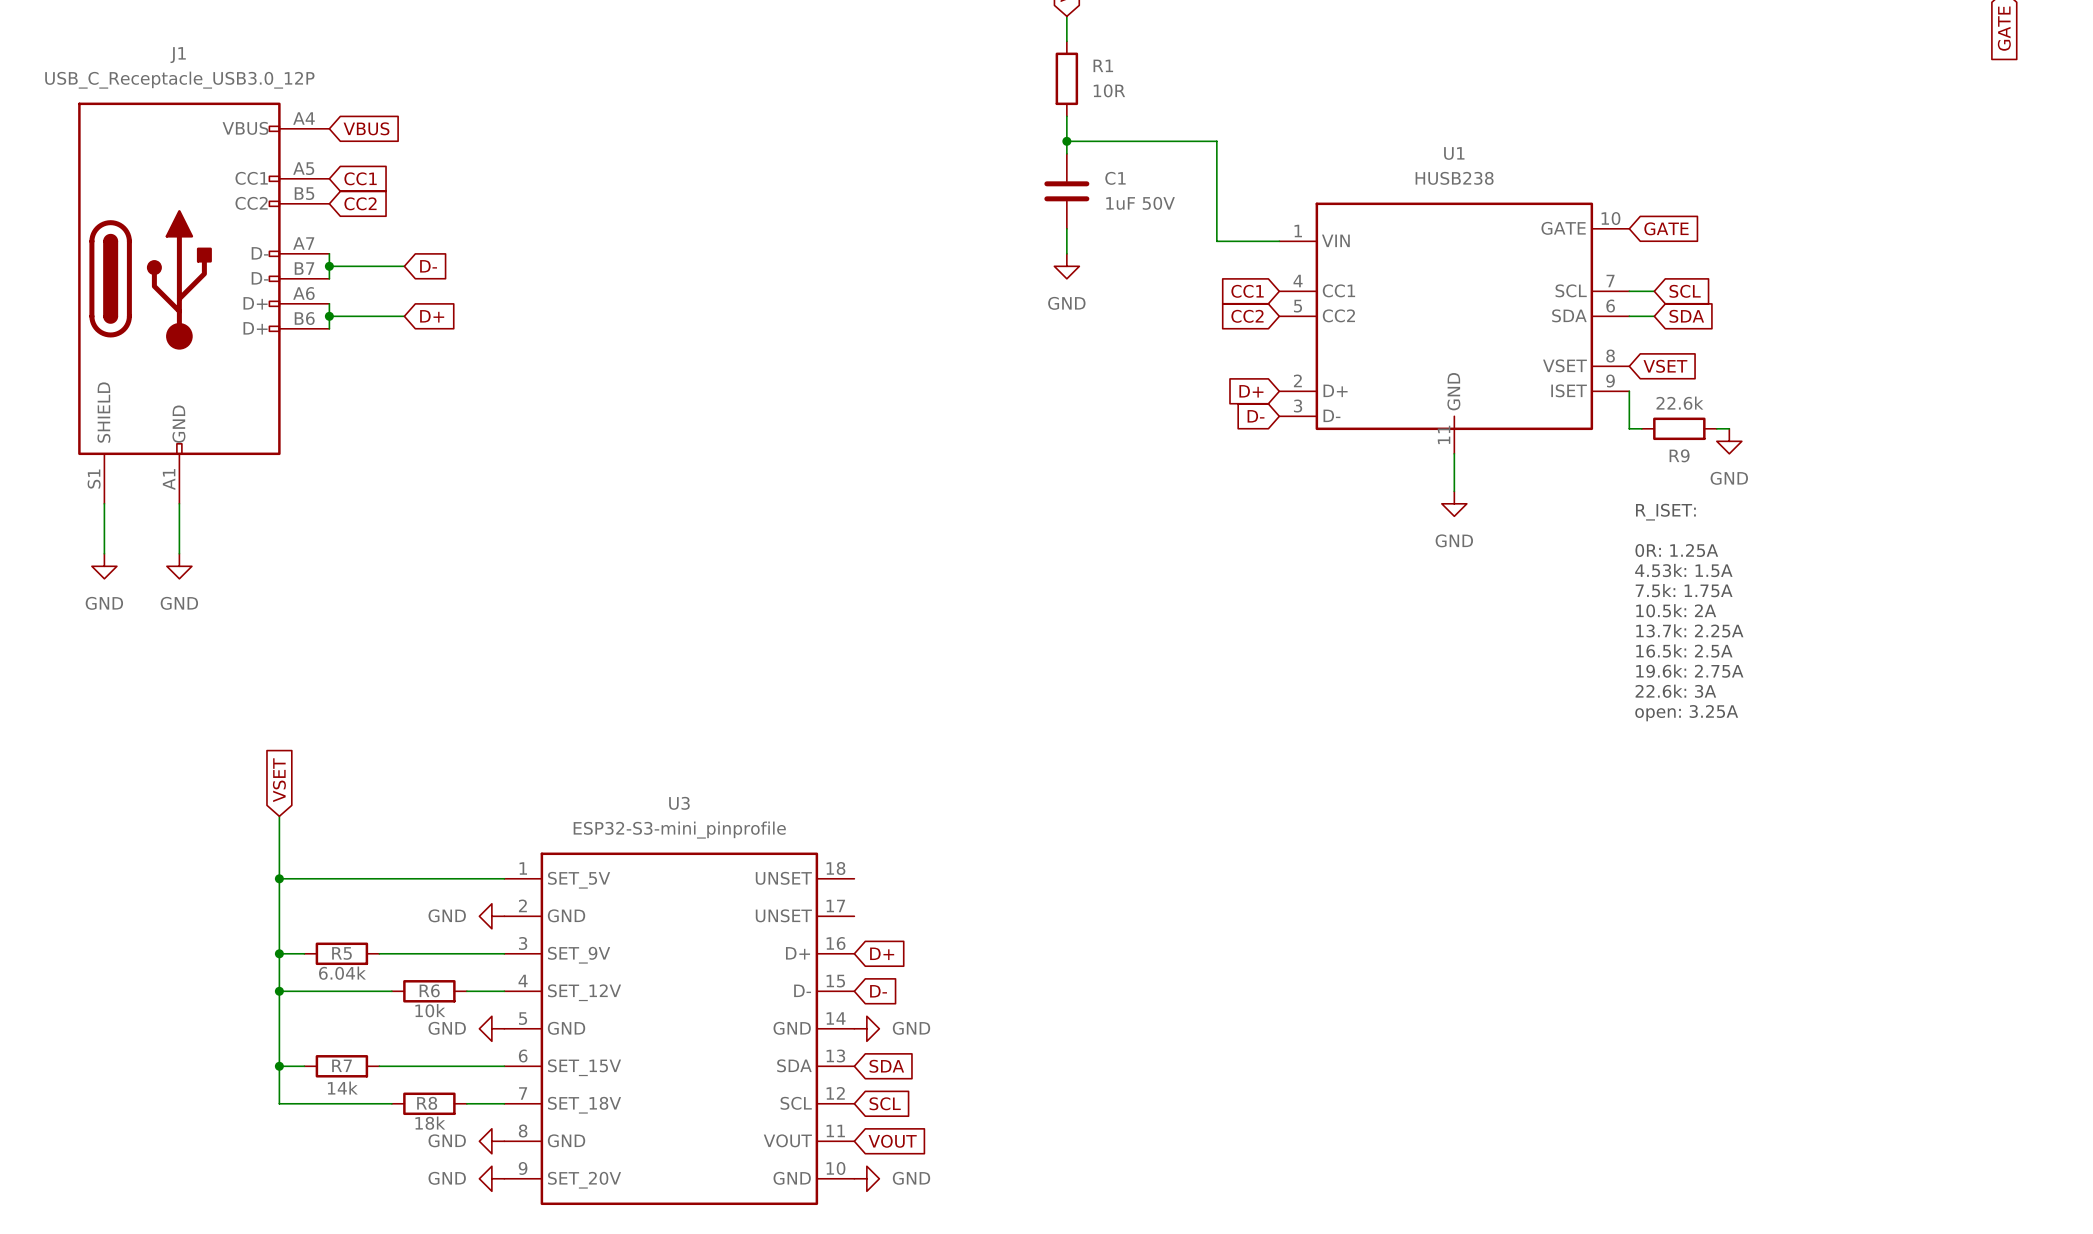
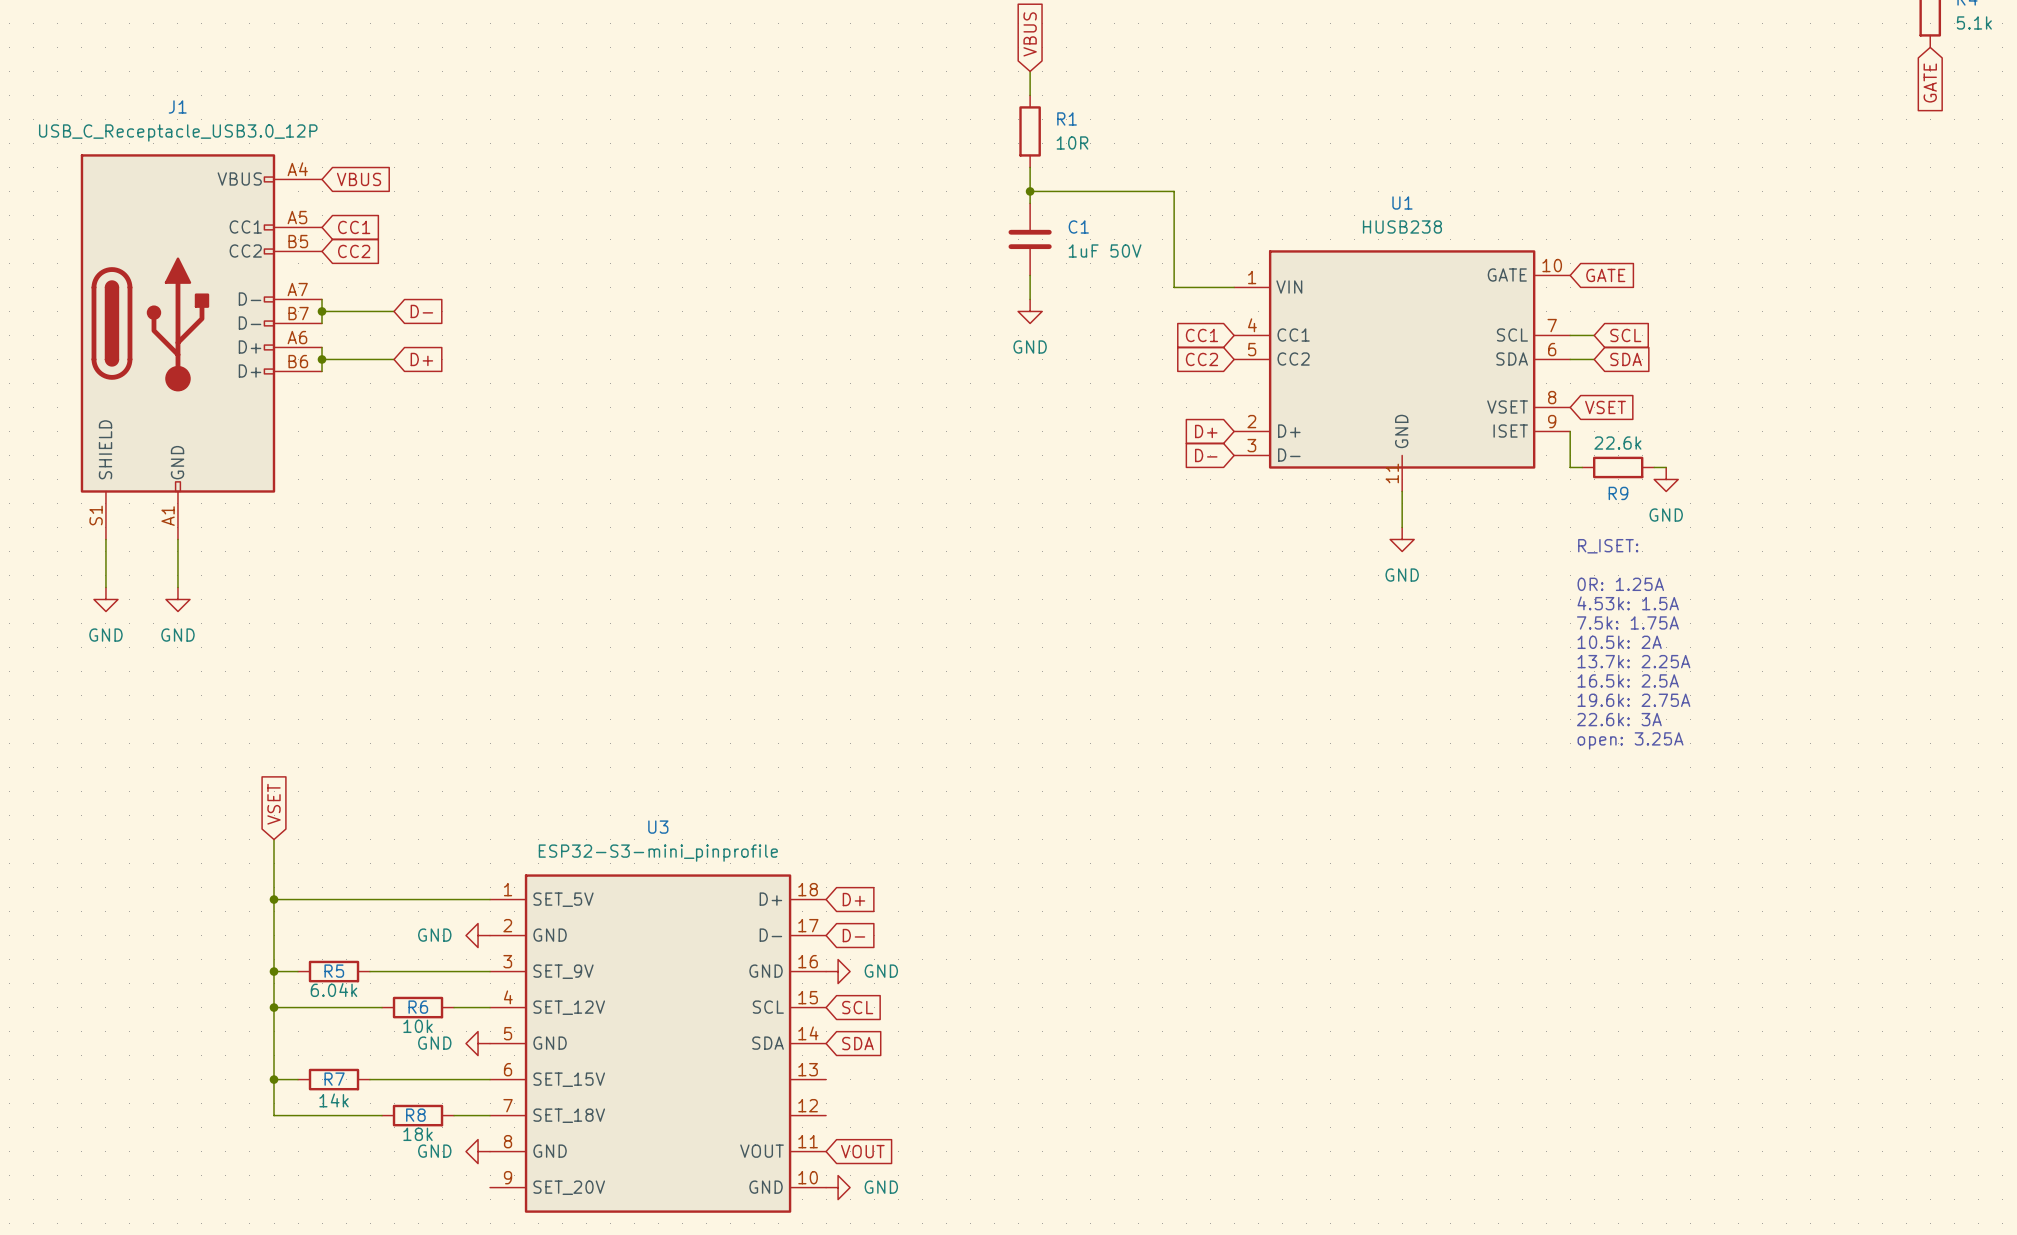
U3 pin name: UNSET (783, 878) -> D+ (770, 899)
U3 pin name: UNSET (783, 915) -> D- (770, 935)
global label: none -> D- (853, 935)
U3 pin name: D+ (798, 953) -> GND (766, 971)
global label position: D+ (882, 953) -> D+ (853, 899)
U3 pin name: D- (802, 990) -> SCL (768, 1007)
global label: D- (878, 991) -> SCL (857, 1007)
U3 pin name: GND (792, 1028) -> SDA (768, 1043)
power symbol position: GND (866, 1028) -> GND (838, 971)
U3 pin name: SDA (794, 1065) -> none
global label position: SDA (886, 1066) -> SDA (857, 1043)
U3 pin name: SCL (796, 1103) -> none
global label: SCL (885, 1103) -> none
power symbol: GND (491, 1178) -> none

